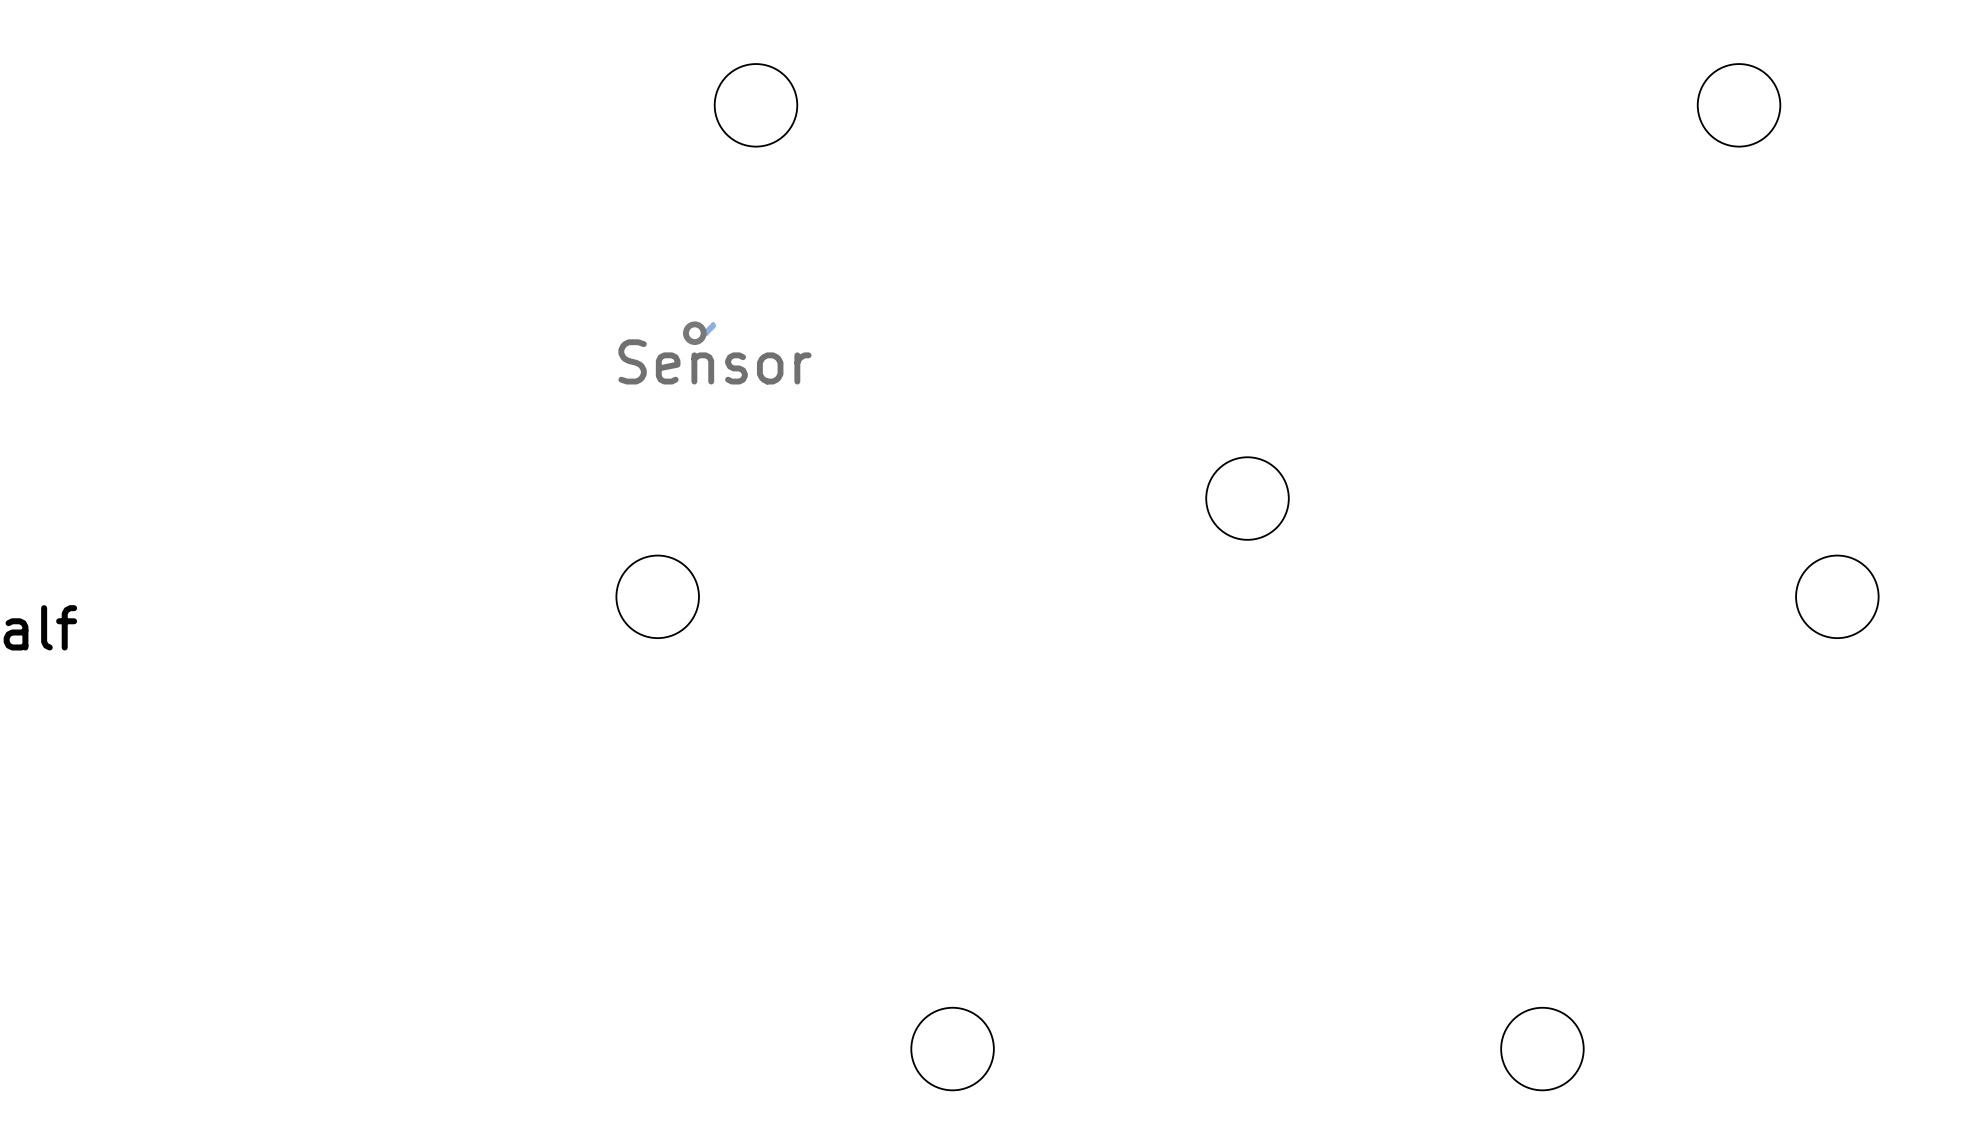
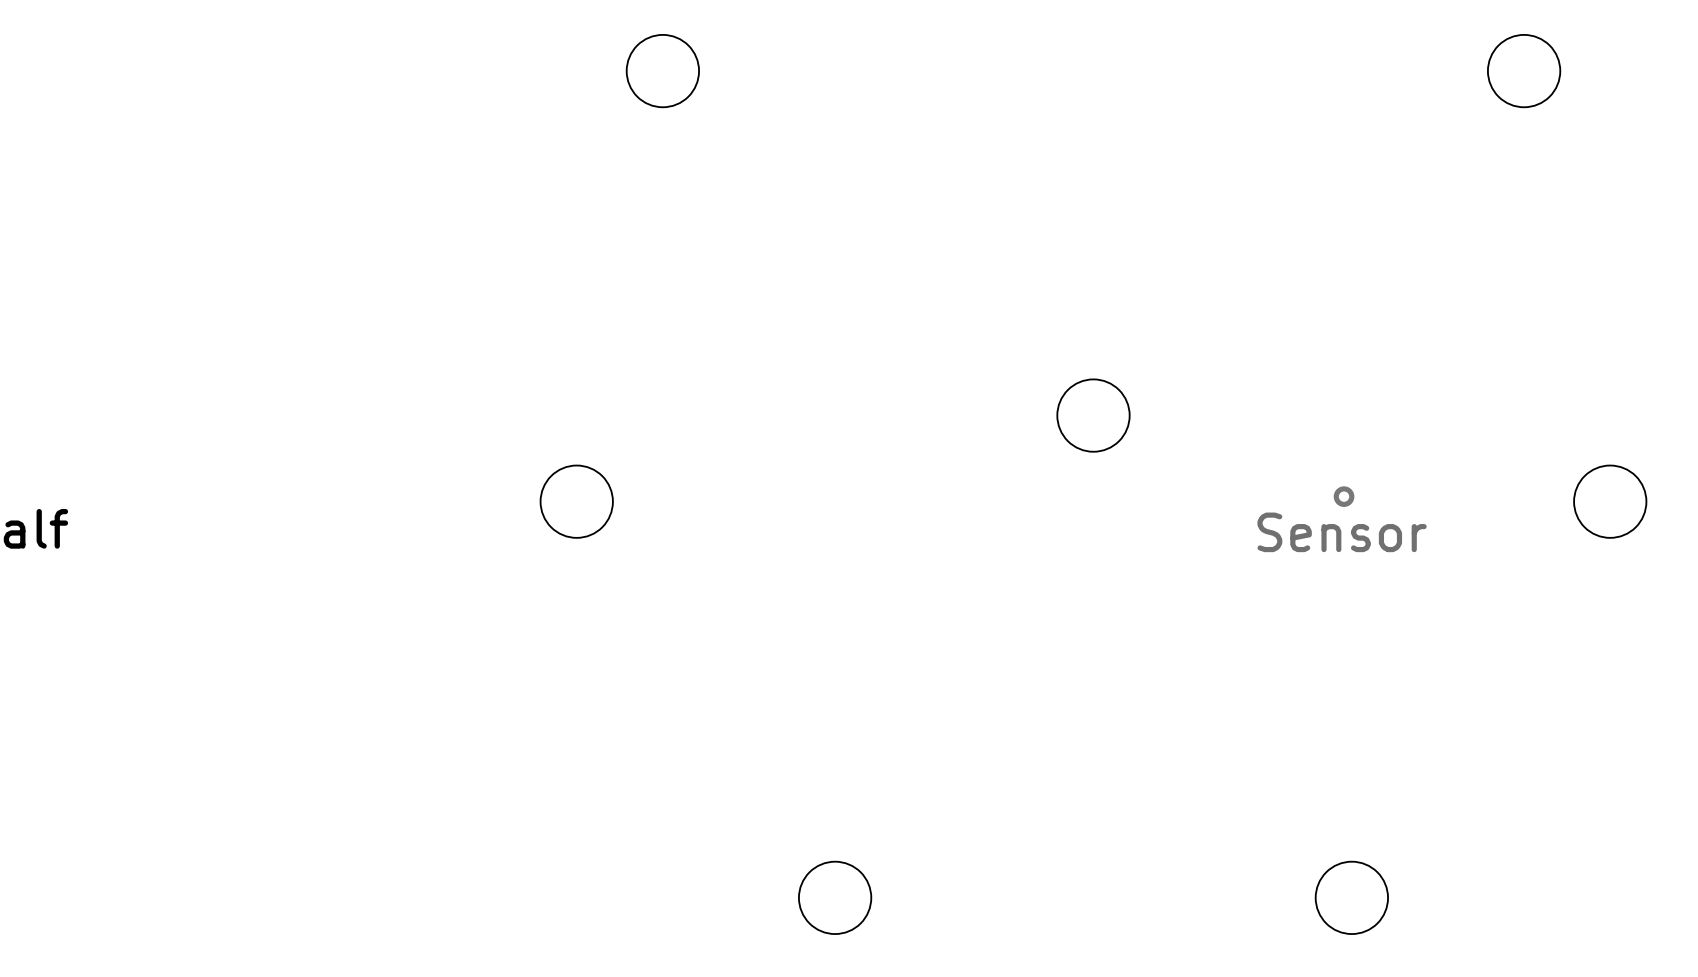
part position: (713, 324) -> (1340, 499)
track: (713, 325) (705, 333) (694, 333) -> none
via: (694, 333) -> none
via: none -> (1344, 496)

